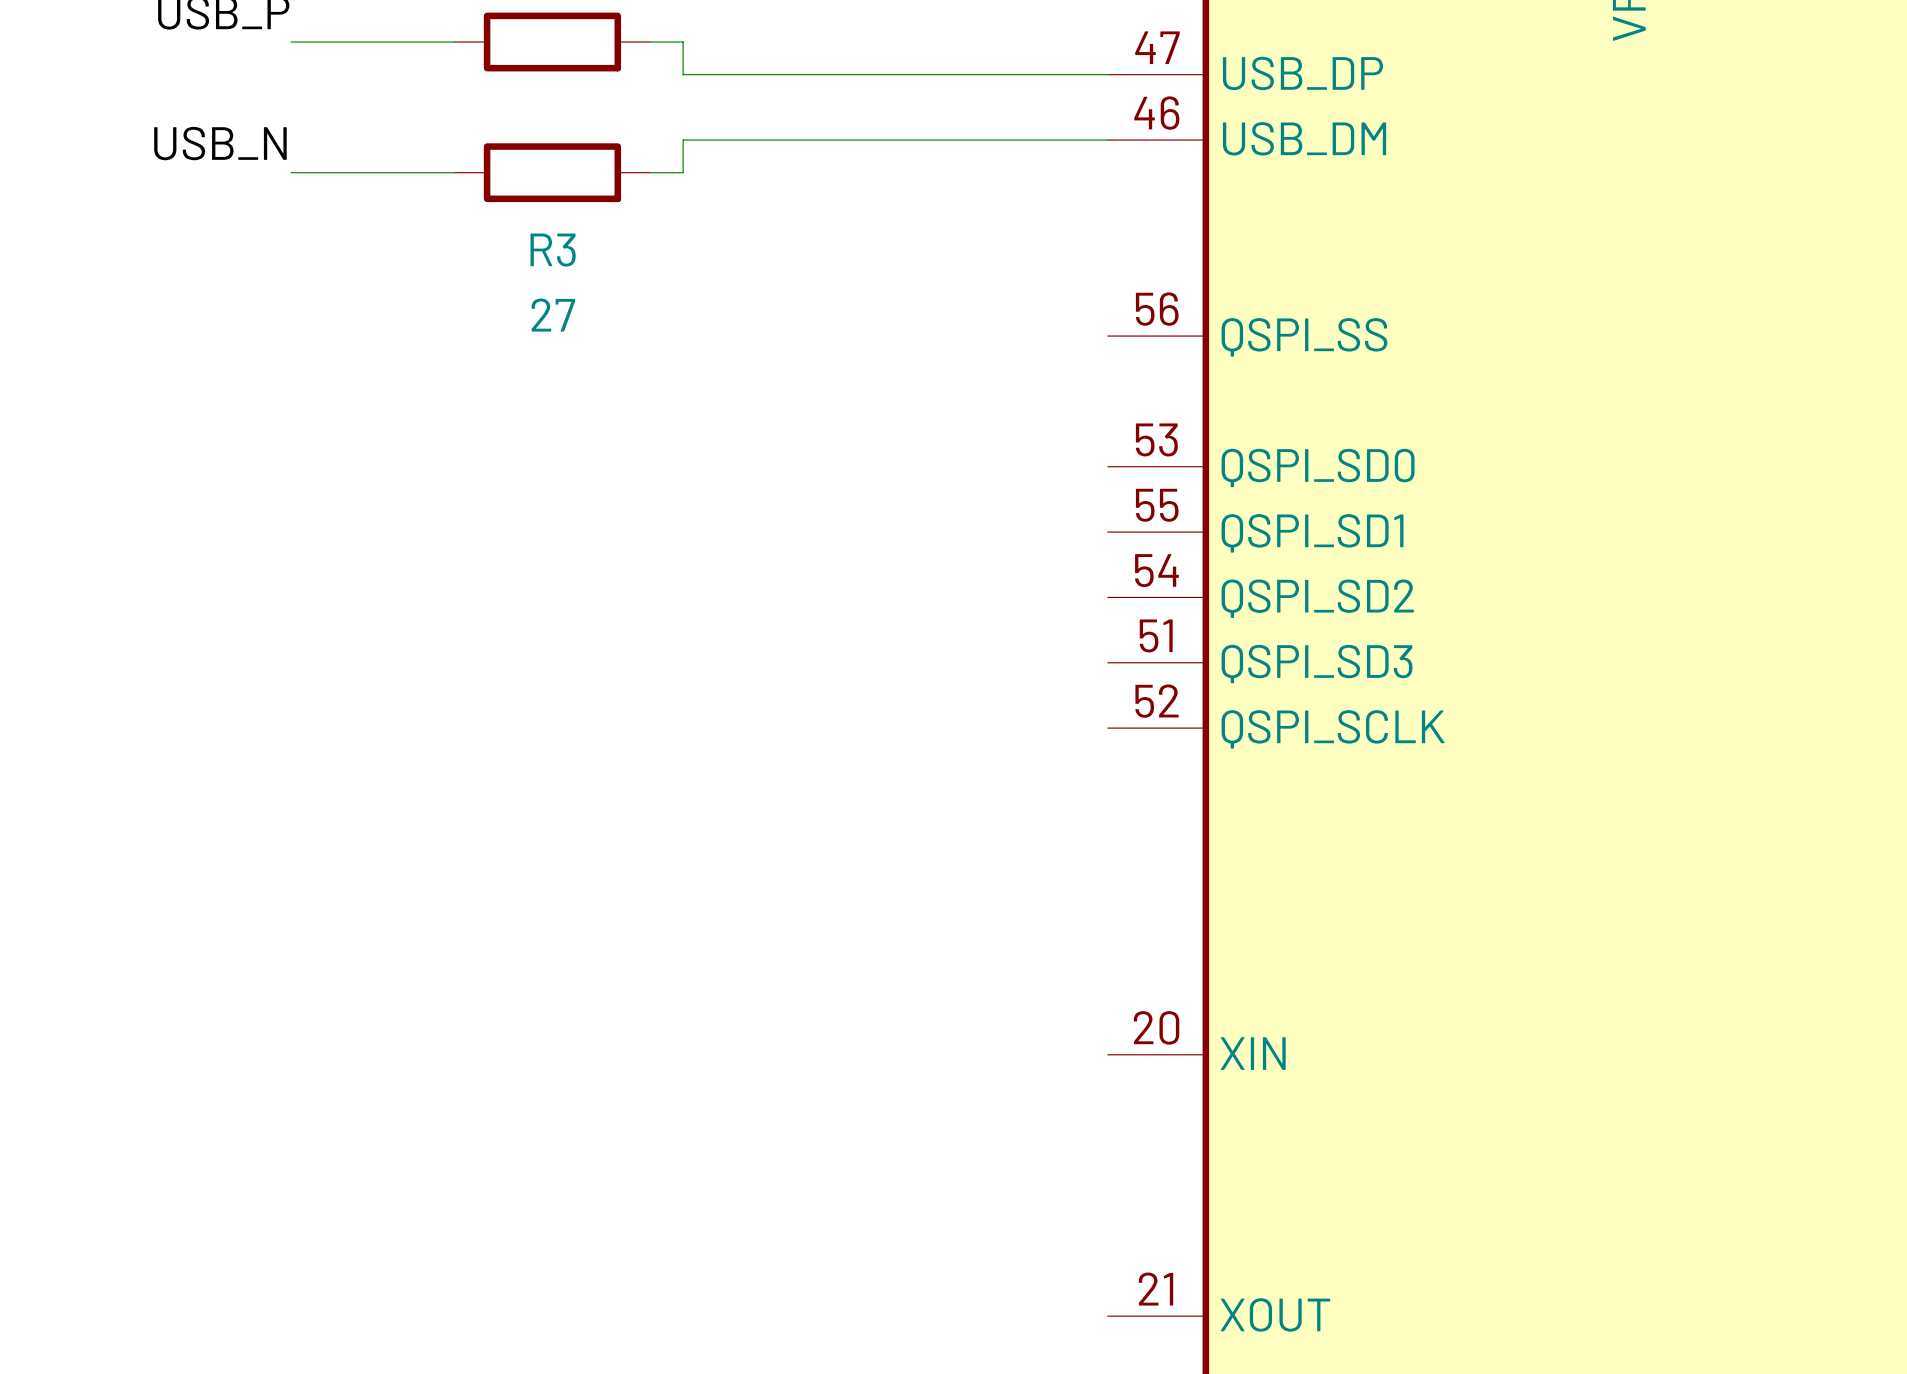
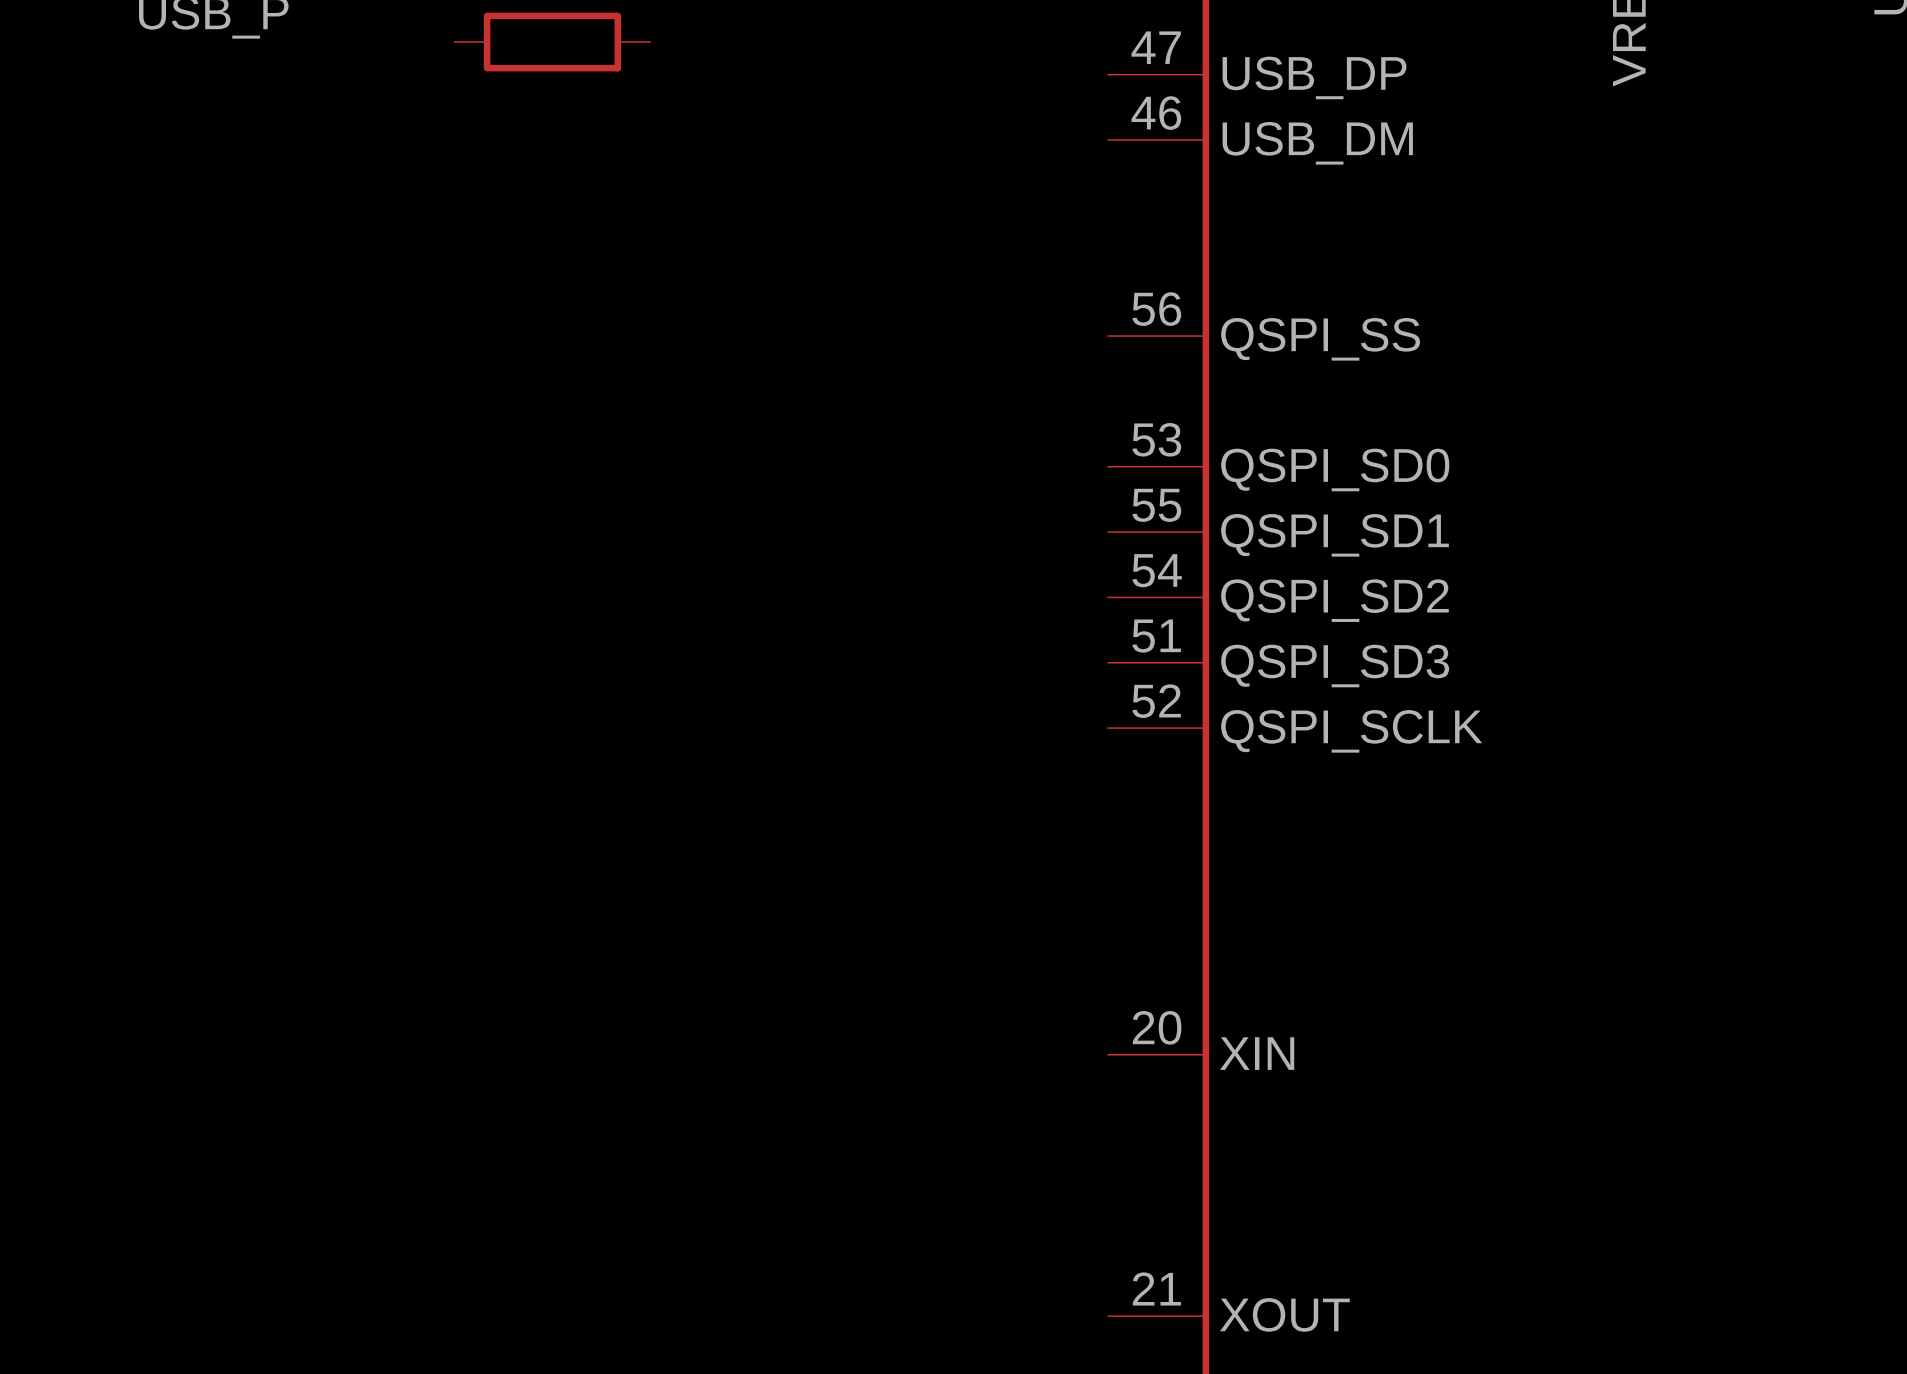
wire: (291, 42) (454, 42) -> none
wire: (650, 42) (683, 42) (683, 74) (1107, 74) -> none
wire: (1107, 140) (683, 140) (683, 172) (650, 172) -> none
label: USB_N (220, 143) -> none
wire: (291, 172) (454, 172) -> none
R3: 27 (552, 172) -> none

